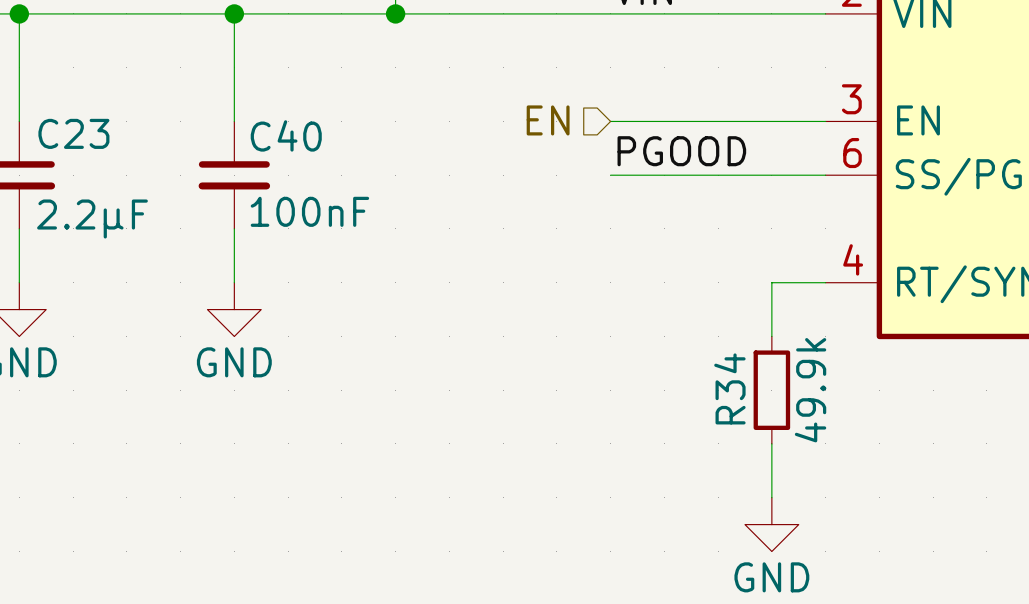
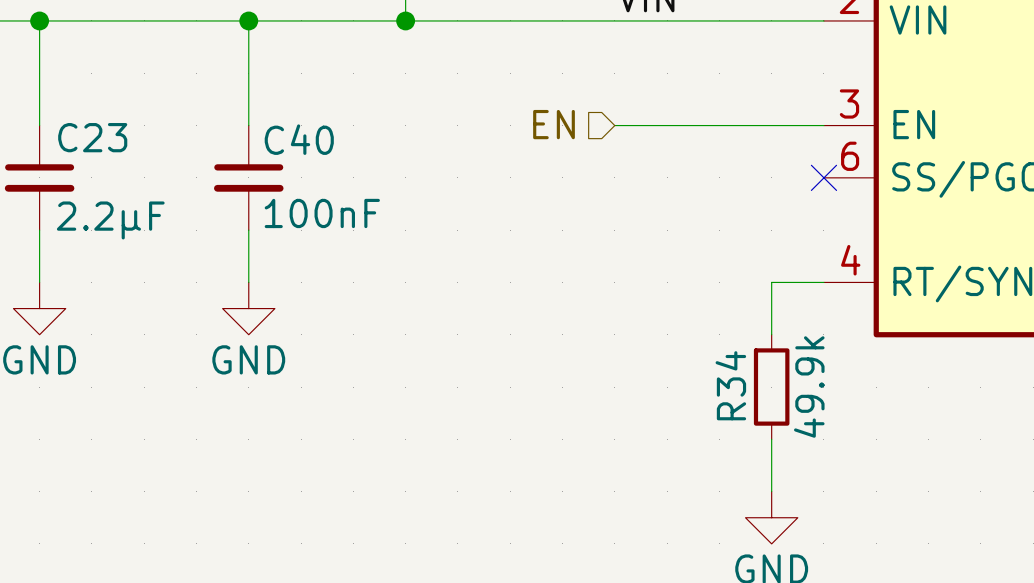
label: PGOOD (681, 151) -> none
wire: (610, 175) (825, 175) -> none
no-connect mark: none -> (823, 177)

